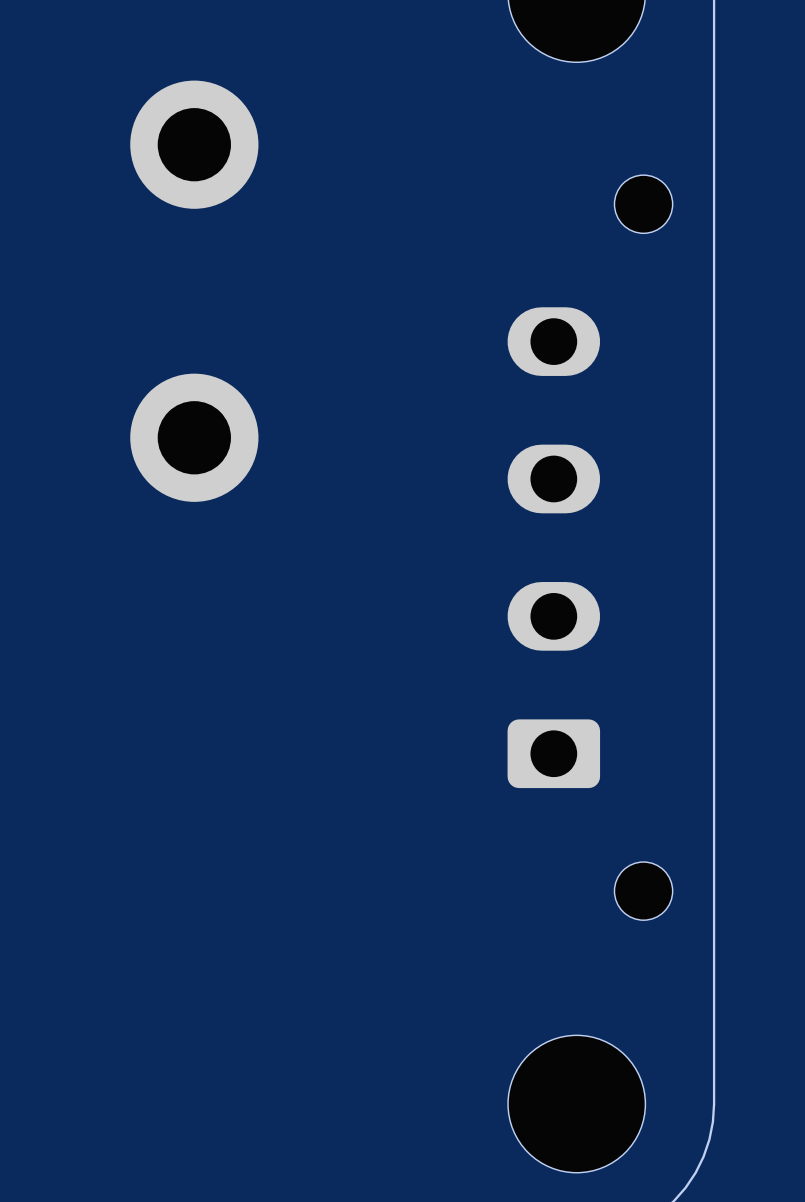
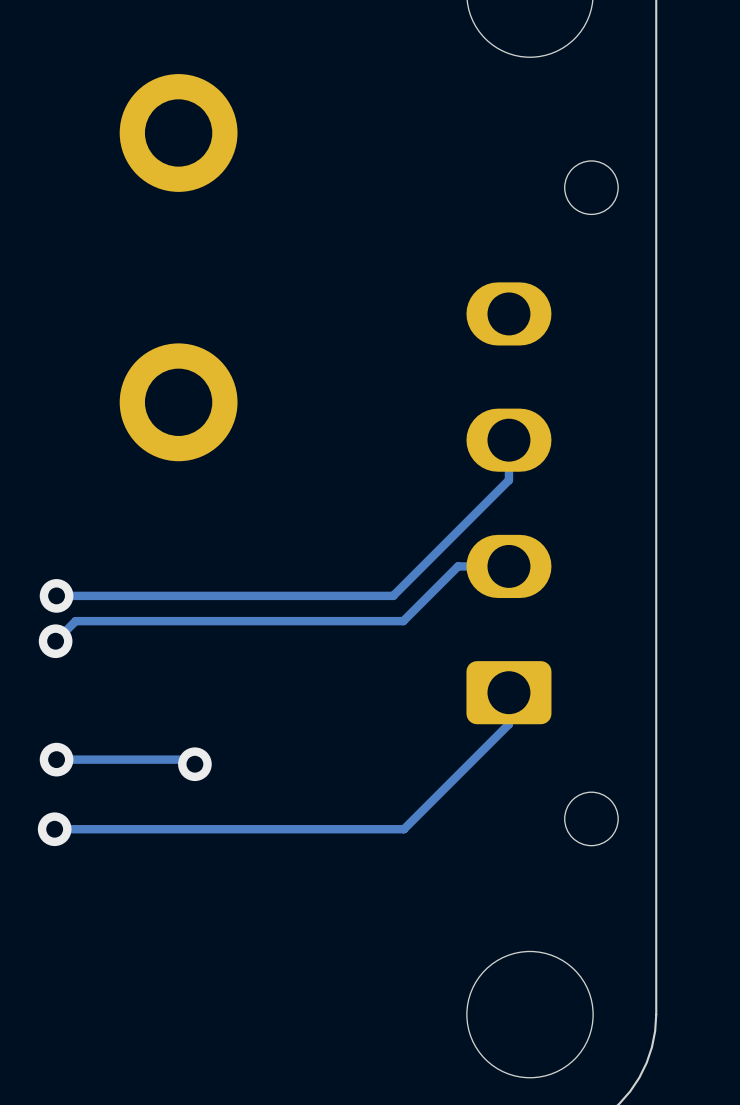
track: none -> (508, 440) (508, 480) (393, 595) (56, 595)
track: none -> (508, 566) (458, 566) (403, 621) (75, 621) (55, 641)
via: none -> (56, 595)
via: none -> (55, 641)
track: none -> (508, 692) (508, 724) (403, 829) (54, 829)
track: none -> (56, 759) (190, 759) (194, 764)
via: none -> (56, 759)
via: none -> (194, 764)
via: none -> (54, 829)

